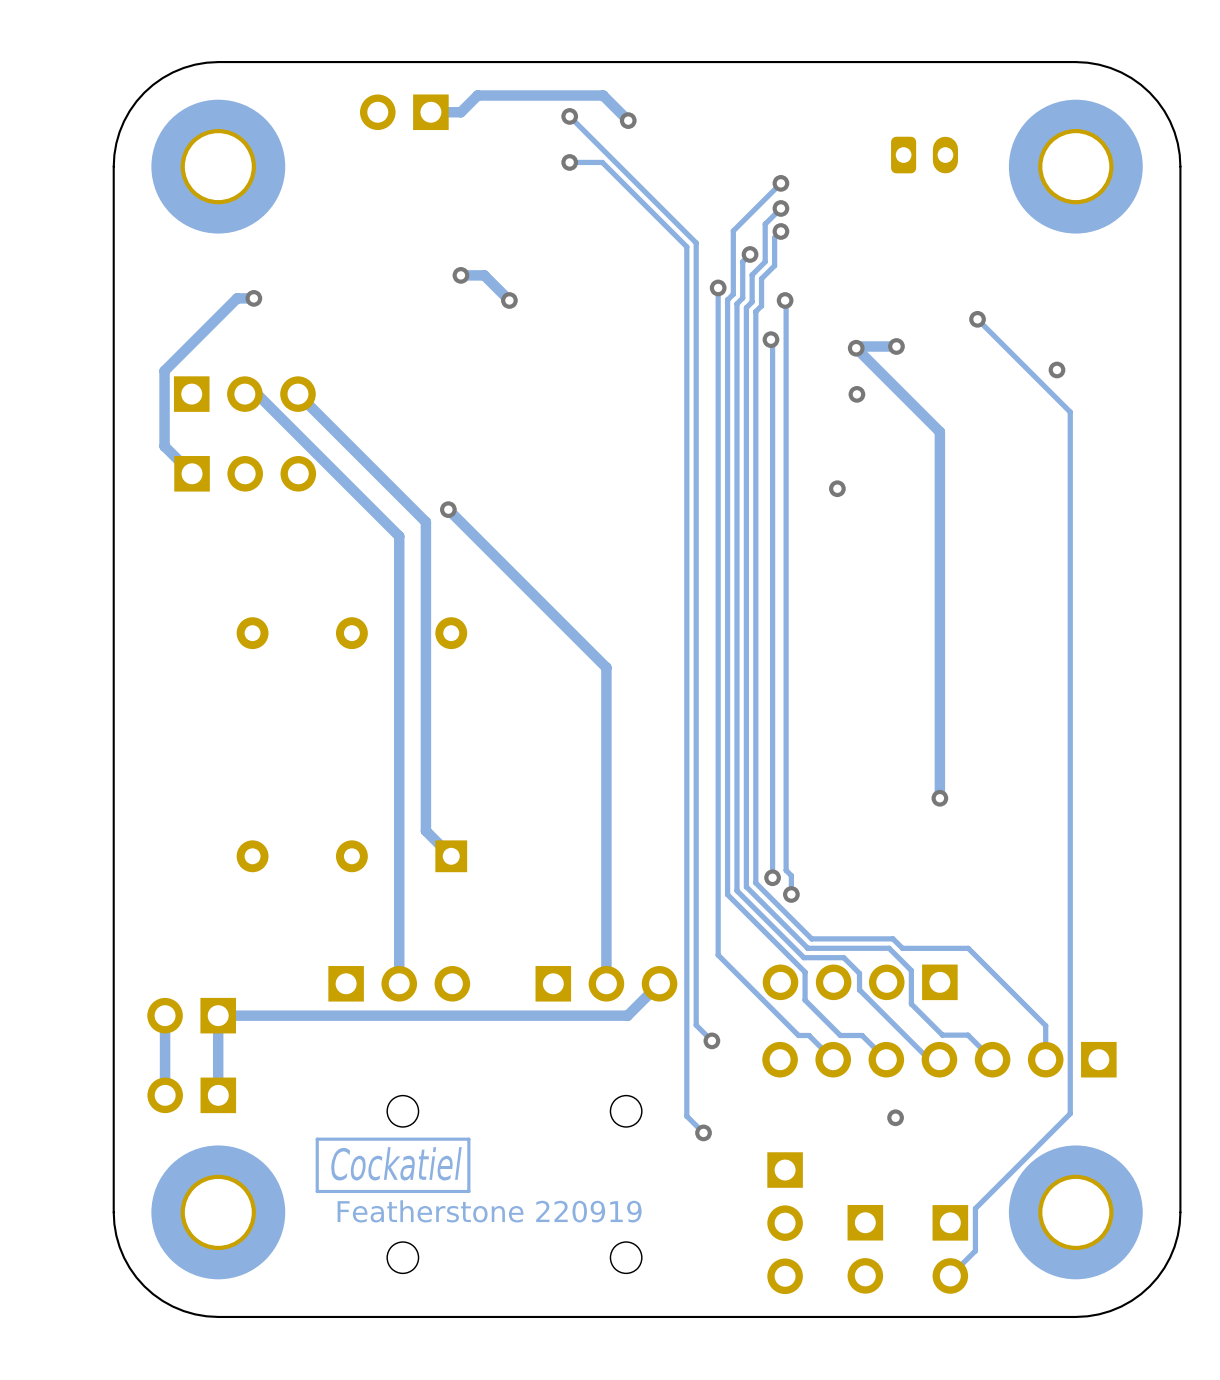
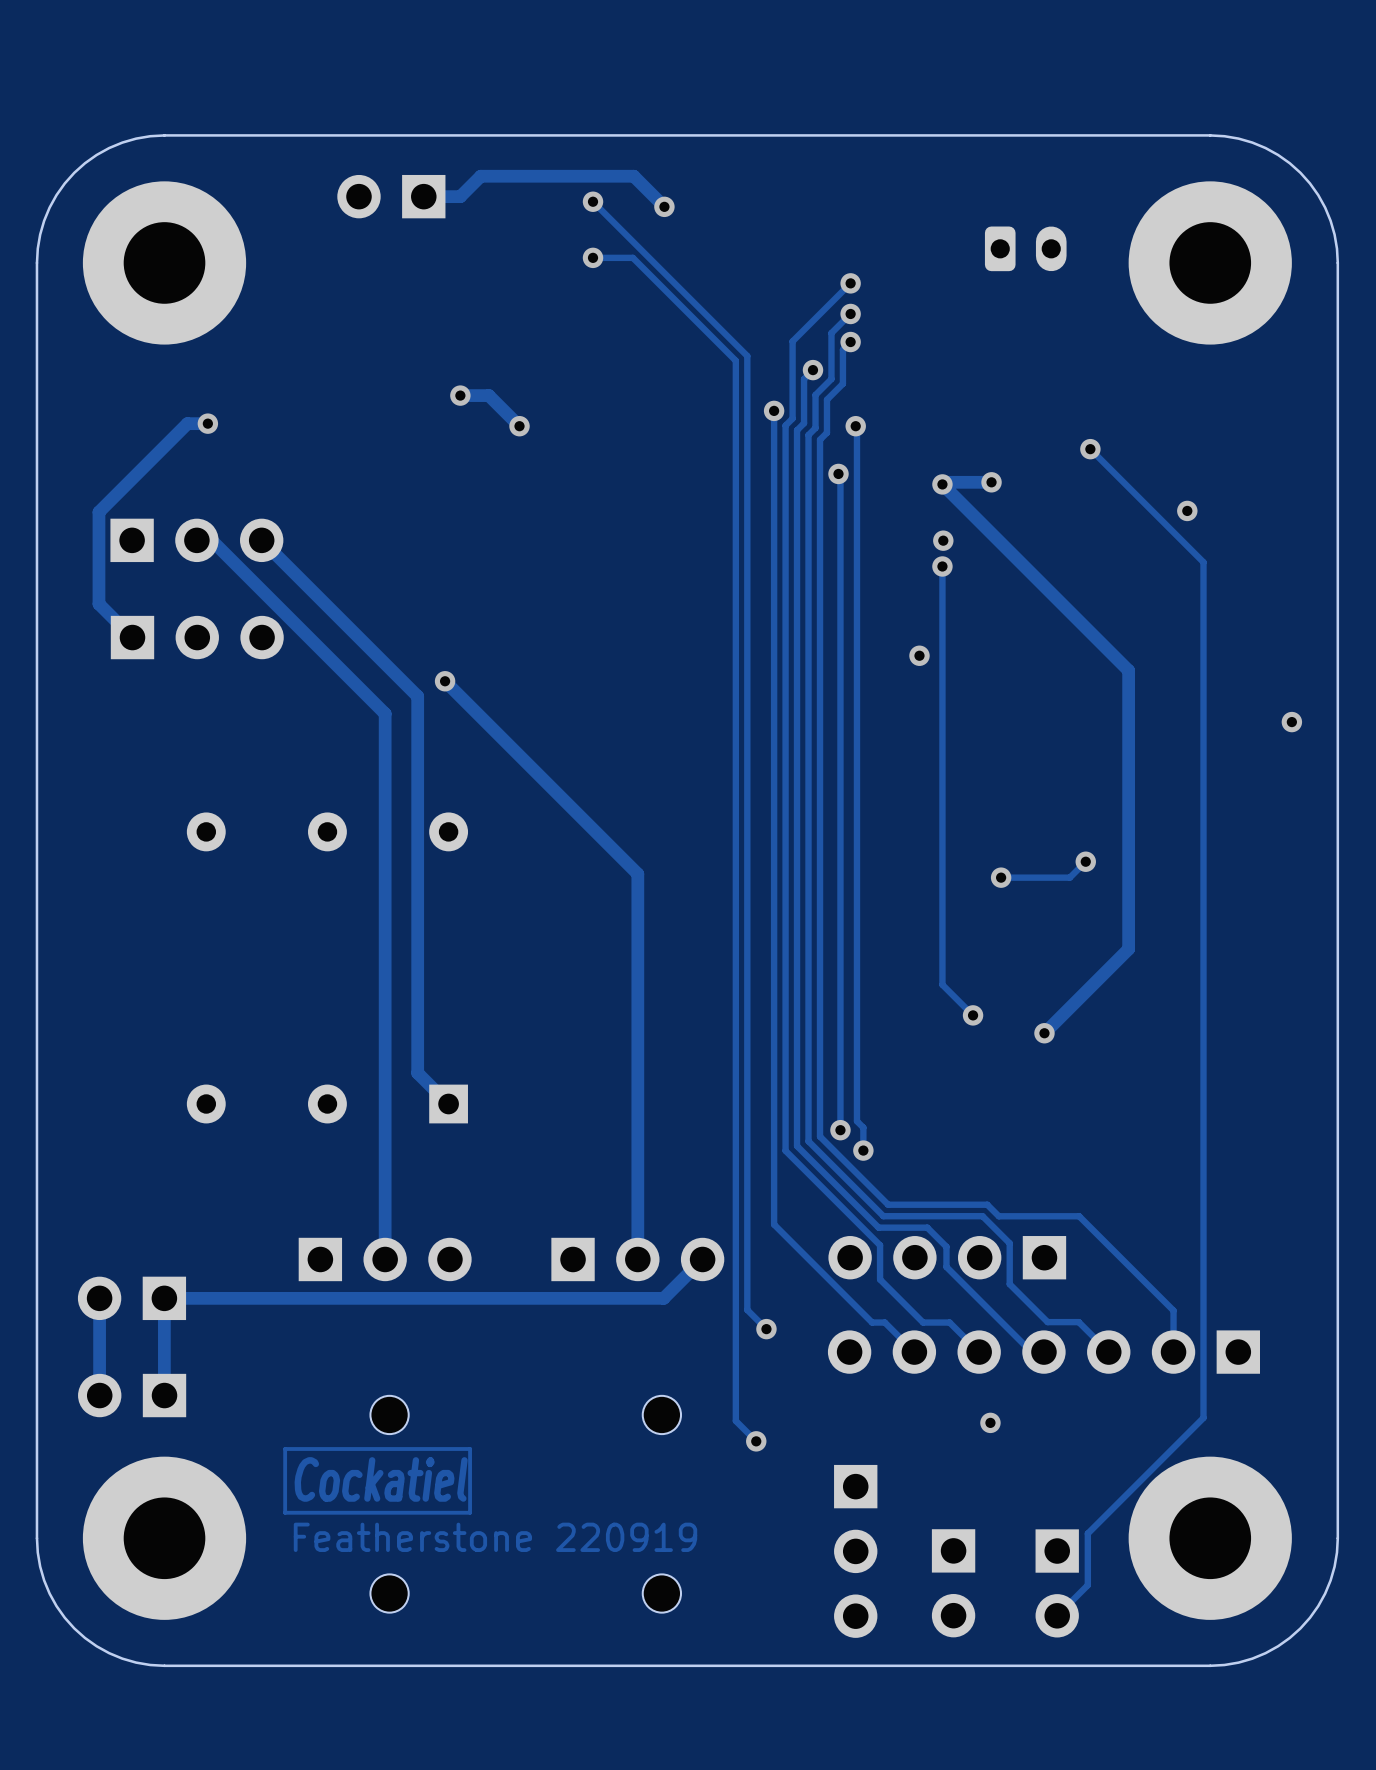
track: none -> (942, 566) (942, 984) (973, 1015)
via: none -> (942, 566)
track: (939, 431) (939, 798) -> (1044, 586) (1128, 670) (1128, 949) (1044, 1033)
via: none -> (1291, 722)
track: none -> (1085, 861) (1069, 877) (1001, 877)
via: none -> (1085, 861)
via: none -> (1001, 877)
via: none -> (973, 1015)

